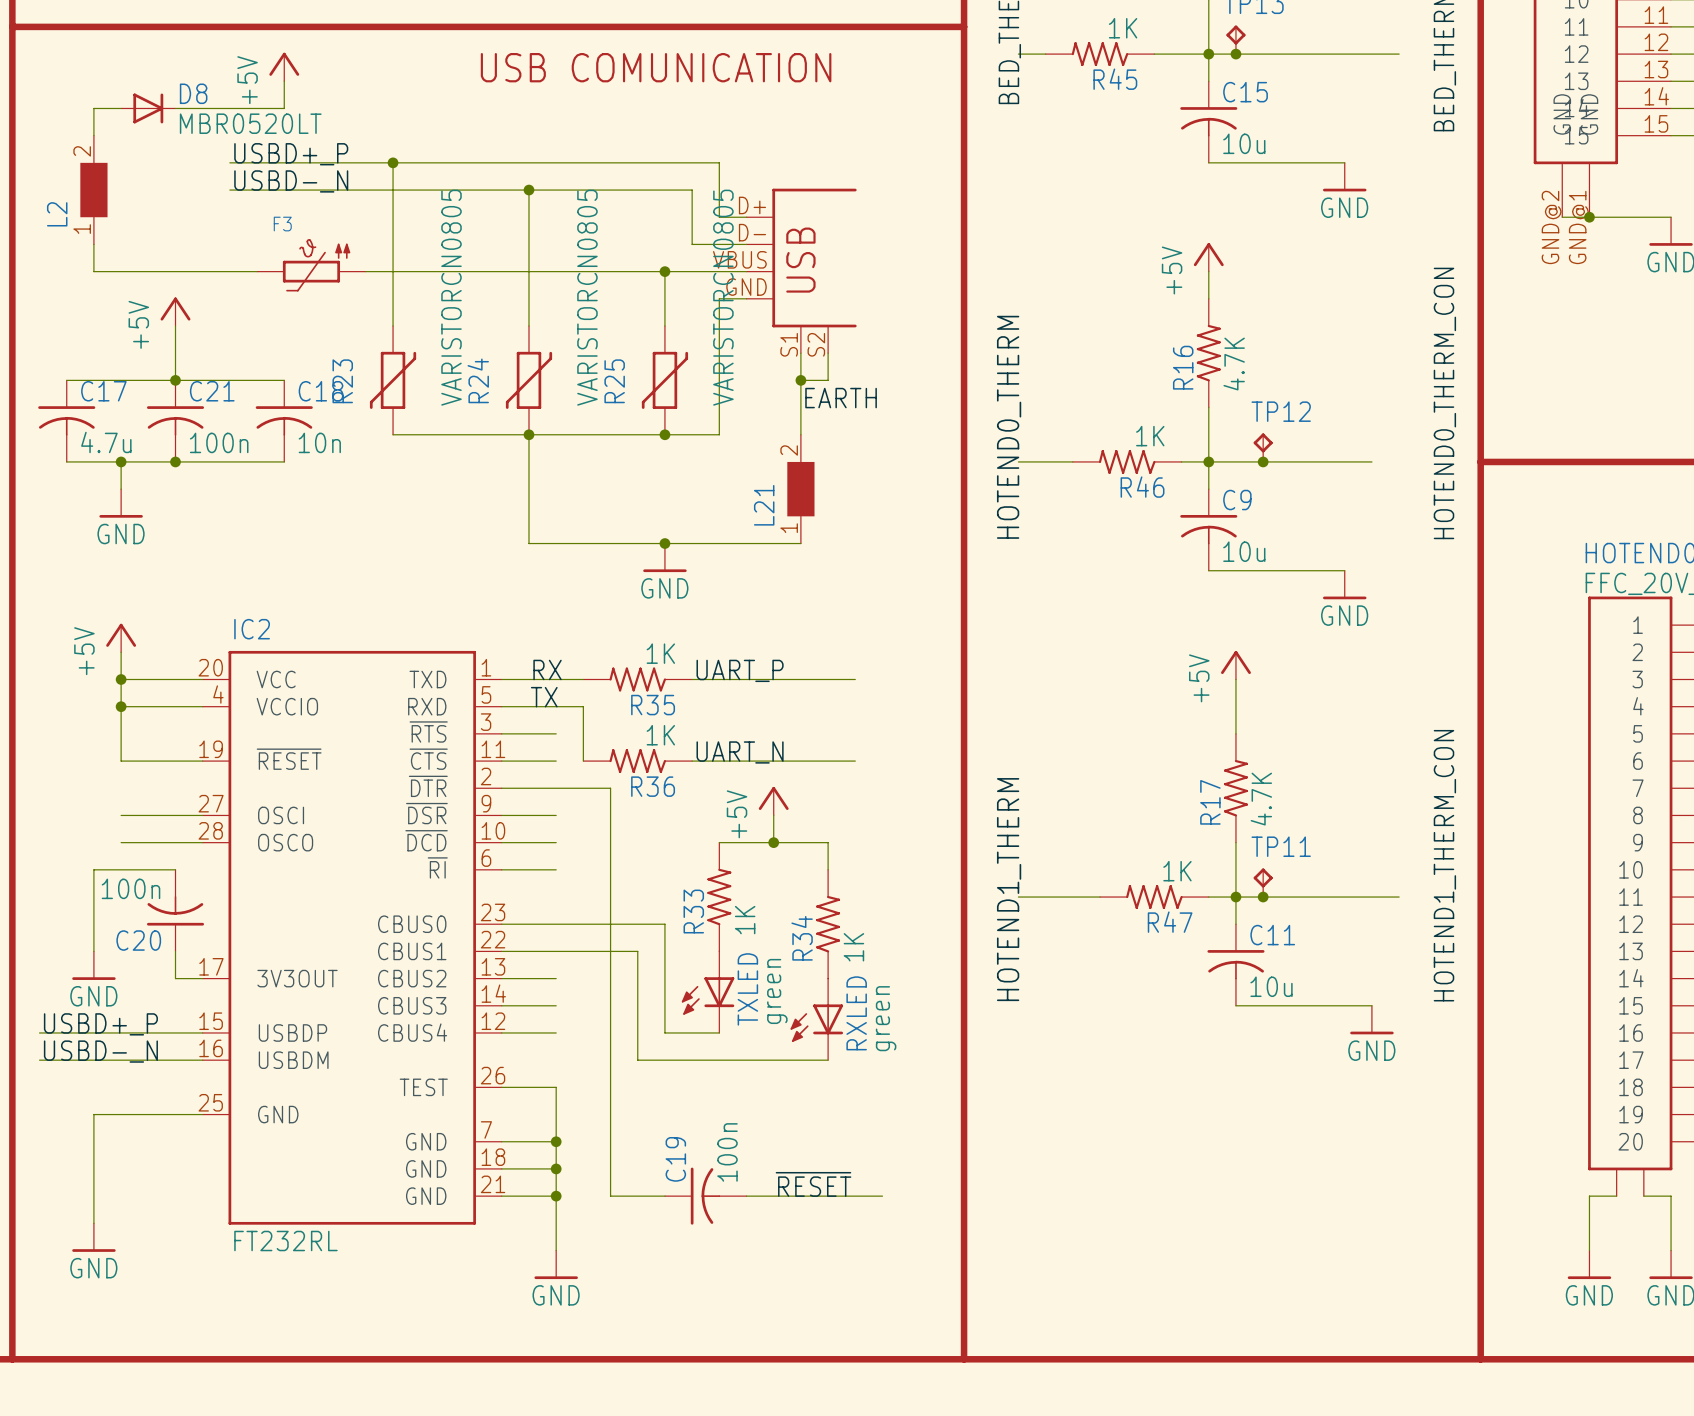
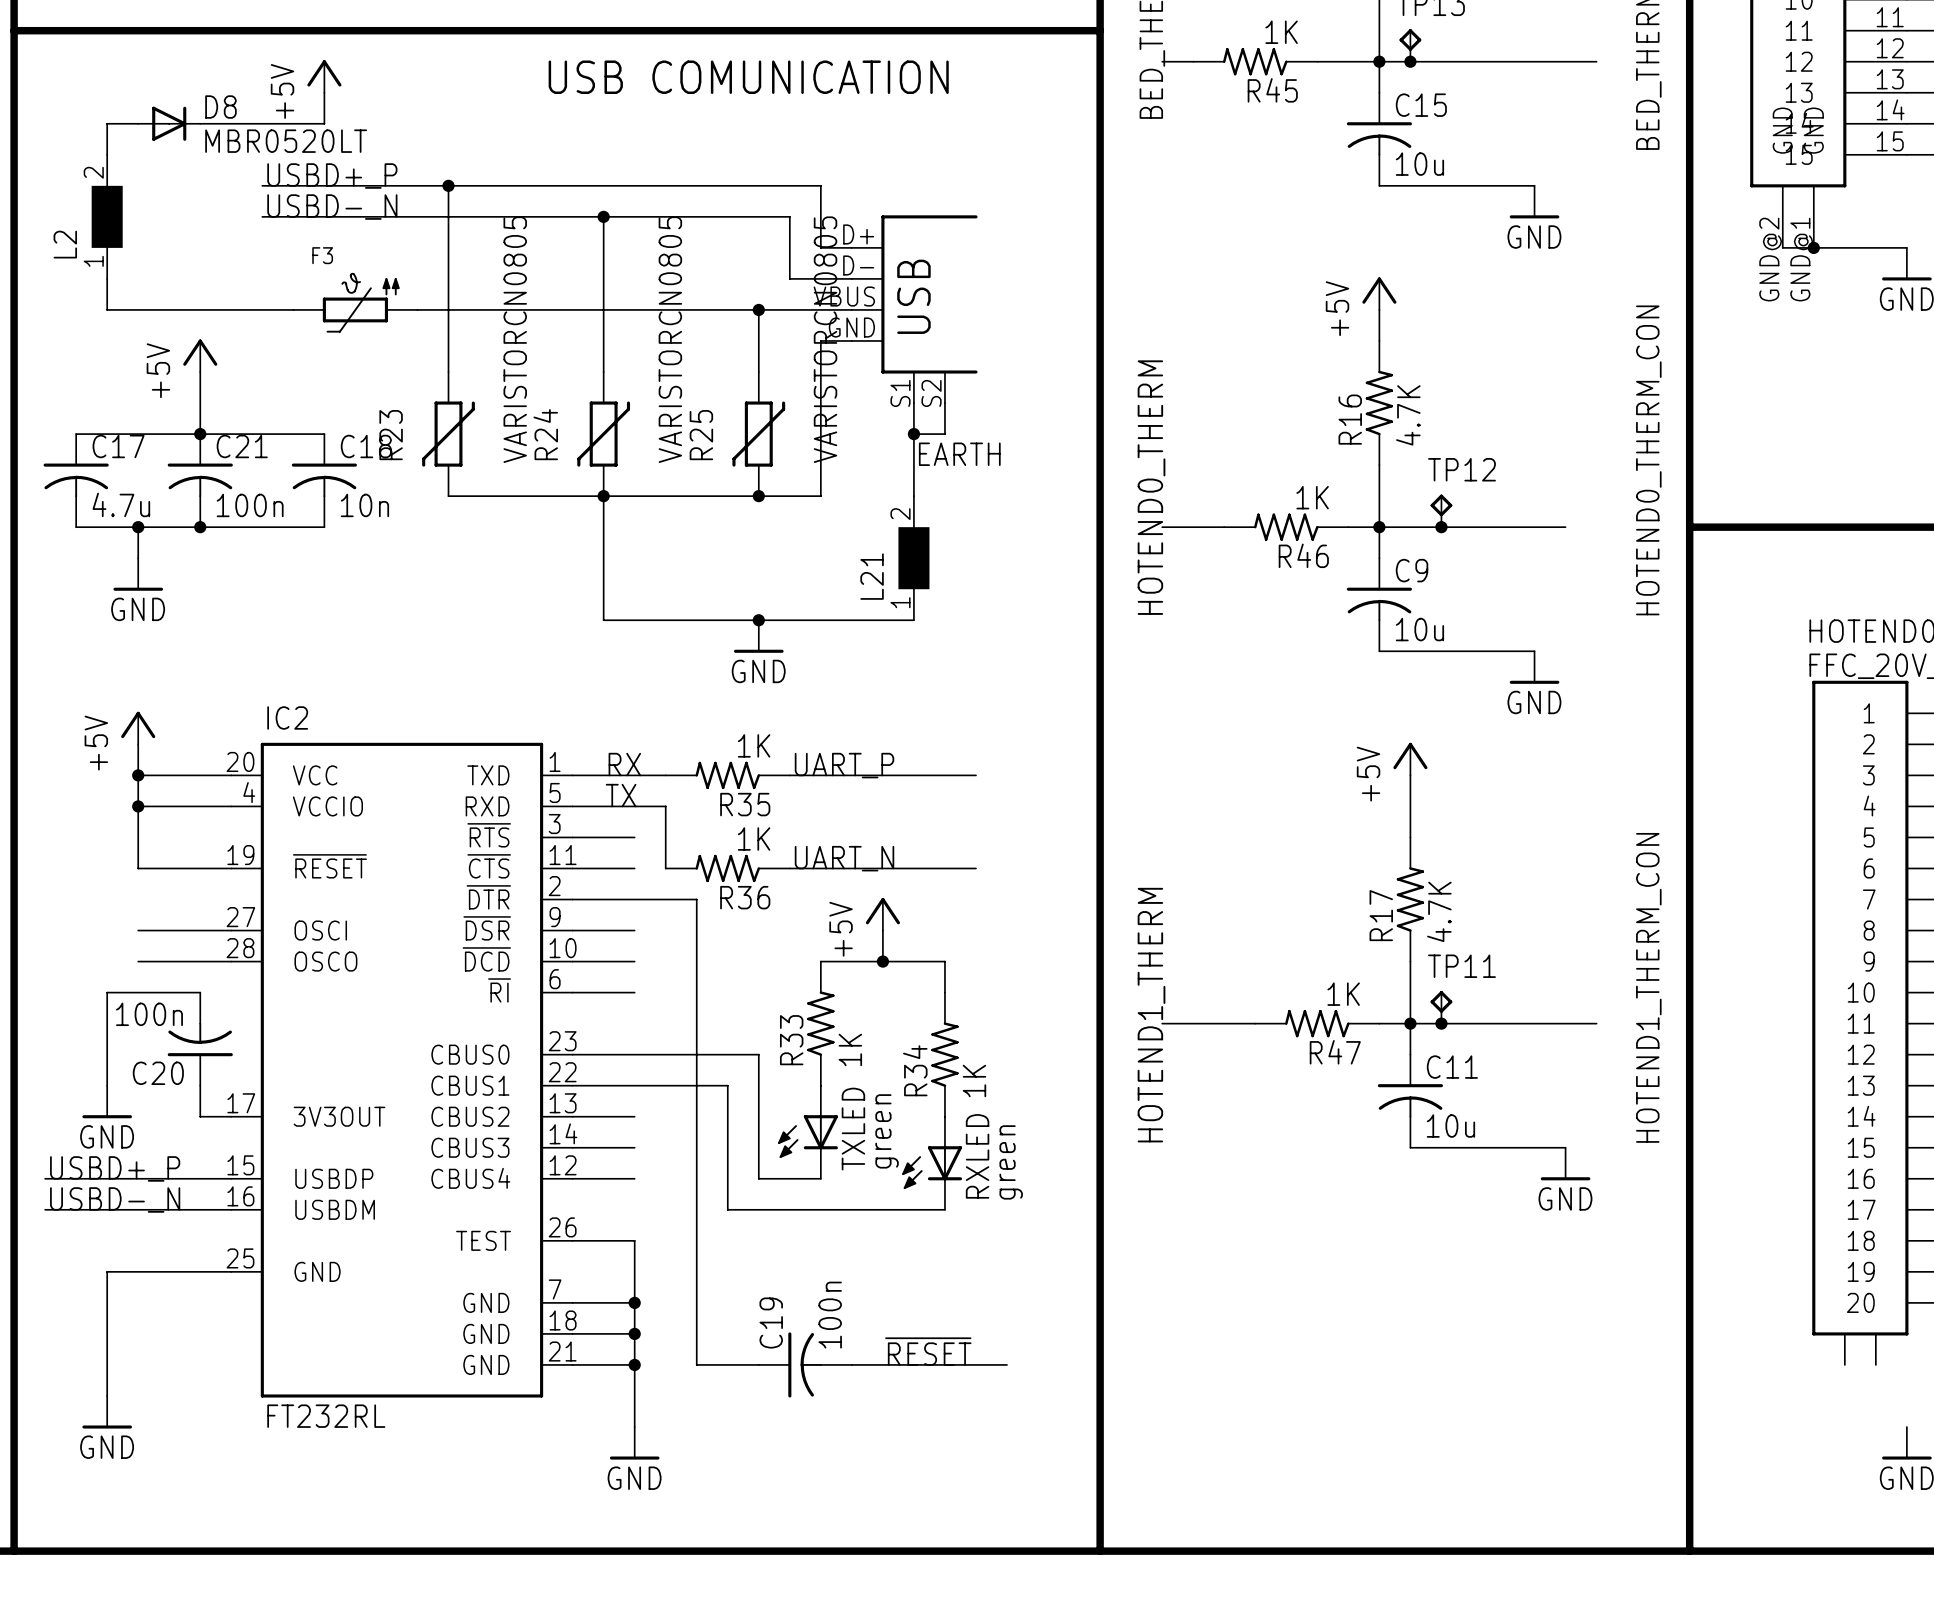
wire: (1616, 1196) (1589, 1196) (1589, 1250) -> none
wire: (1643, 1196) (1671, 1196) (1671, 1250) -> none
power symbol: GND (1589, 1264) -> none

